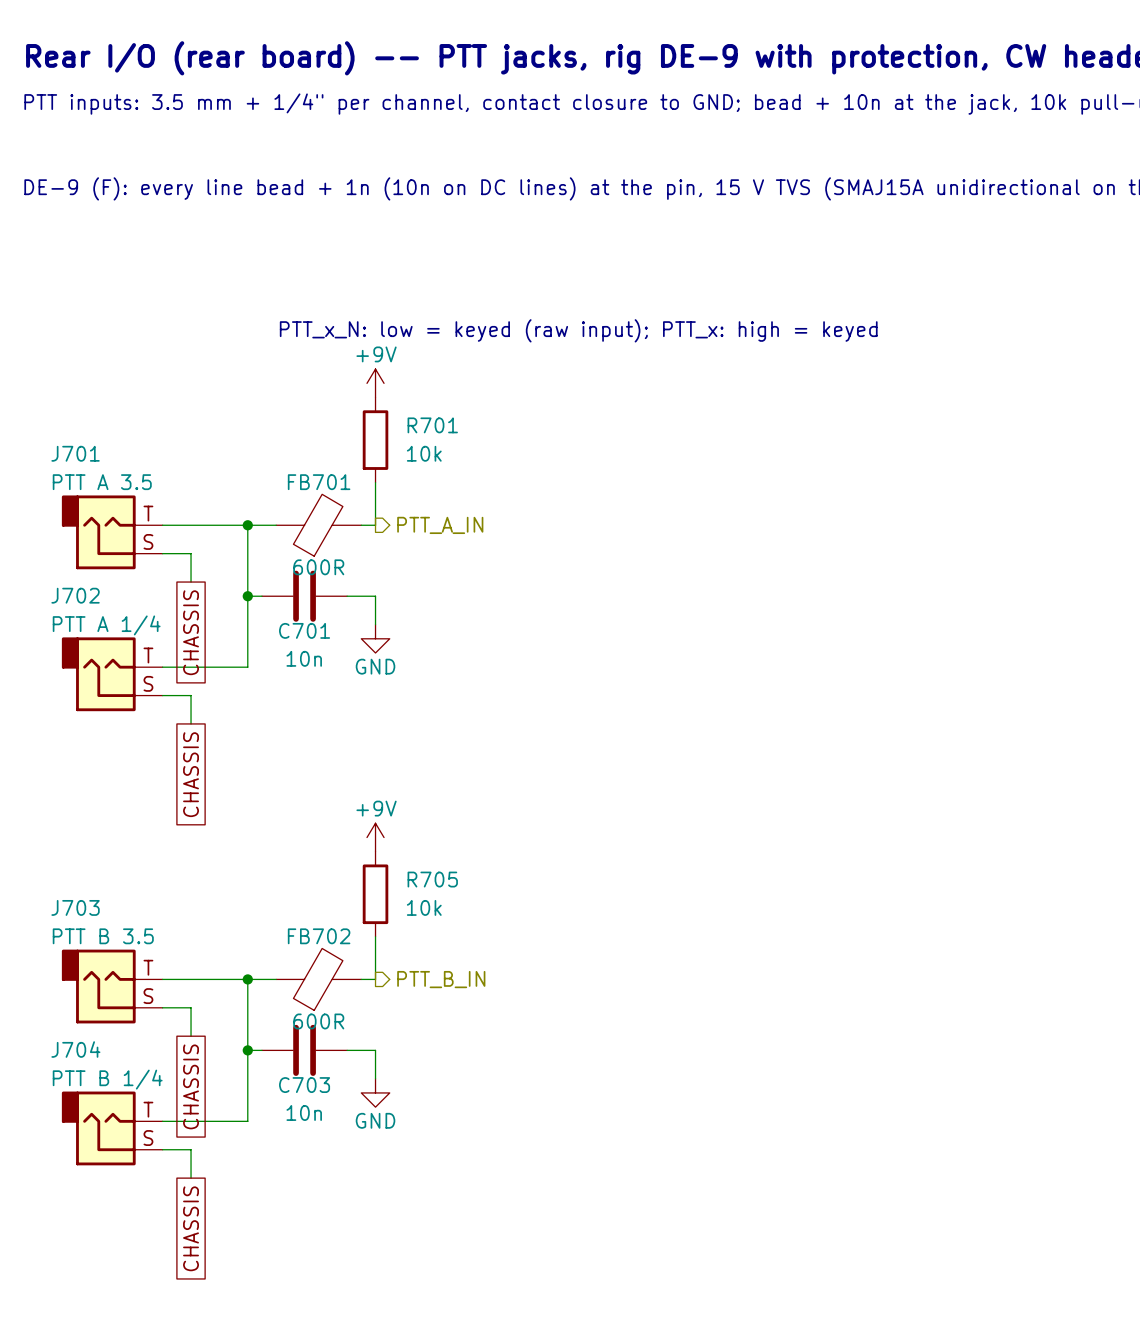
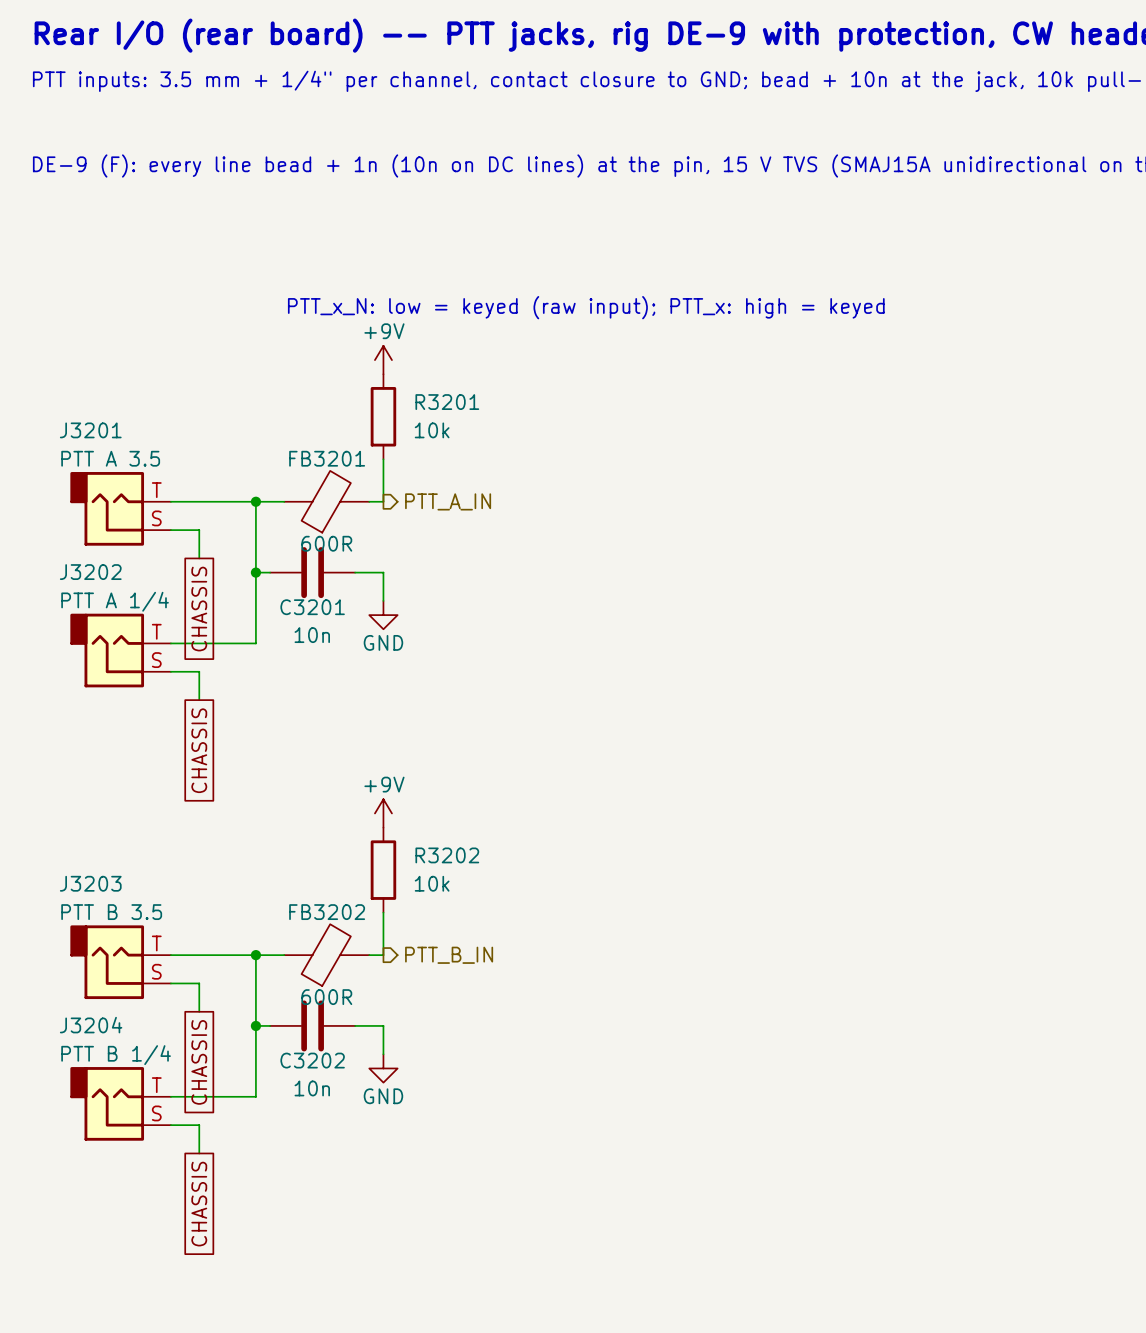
R701 name: R701 (432, 425) -> R3201 (447, 402)
J701 name: J701 (75, 453) -> J3201 (90, 430)
FB701 name: FB701 (319, 482) -> FB3201 (327, 458)
J702 name: J702 (75, 595) -> J3202 (90, 572)
C701 name: C701 (304, 630) -> C3201 (312, 607)
R705 name: R705 (432, 879) -> R3202 (447, 855)
J703 name: J703 (75, 907) -> J3203 (90, 883)
FB702 name: FB702 (319, 936) -> FB3202 (327, 912)
J704 name: J704 (75, 1049) -> J3204 (91, 1025)
C703 name: C703 (304, 1085) -> C3202 (312, 1060)

